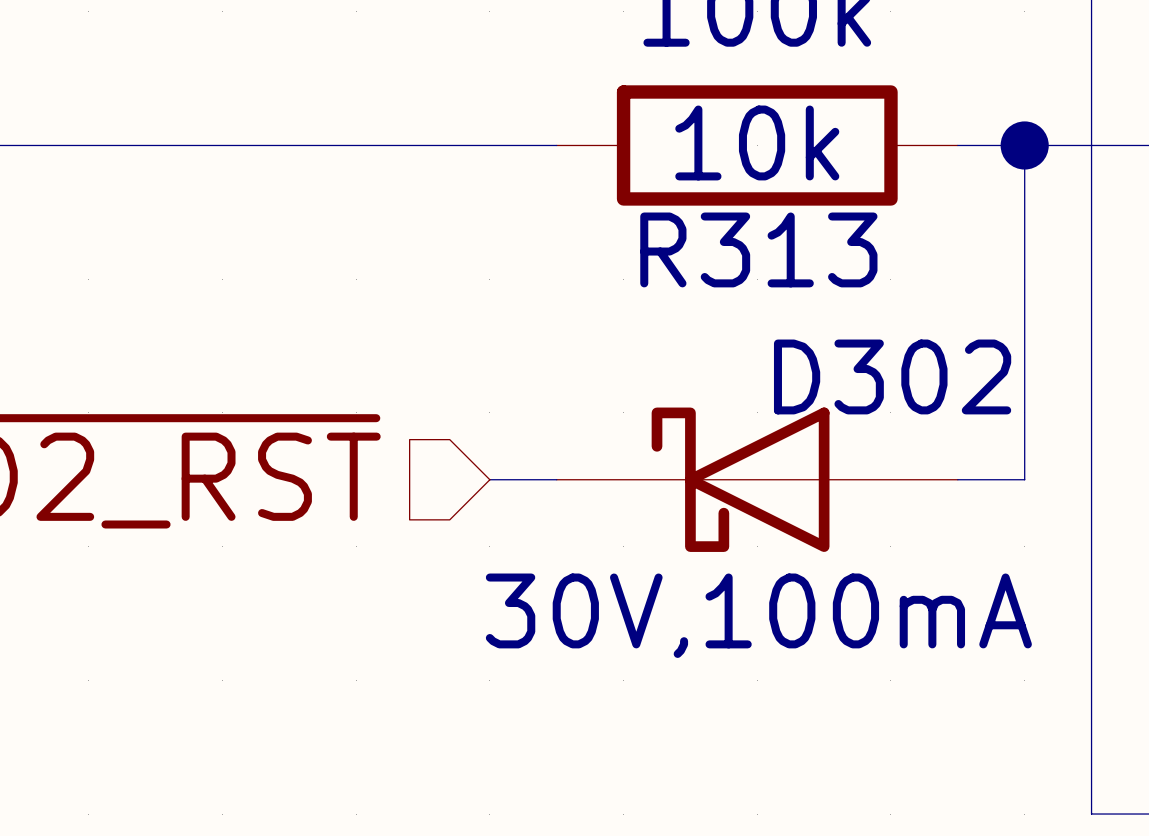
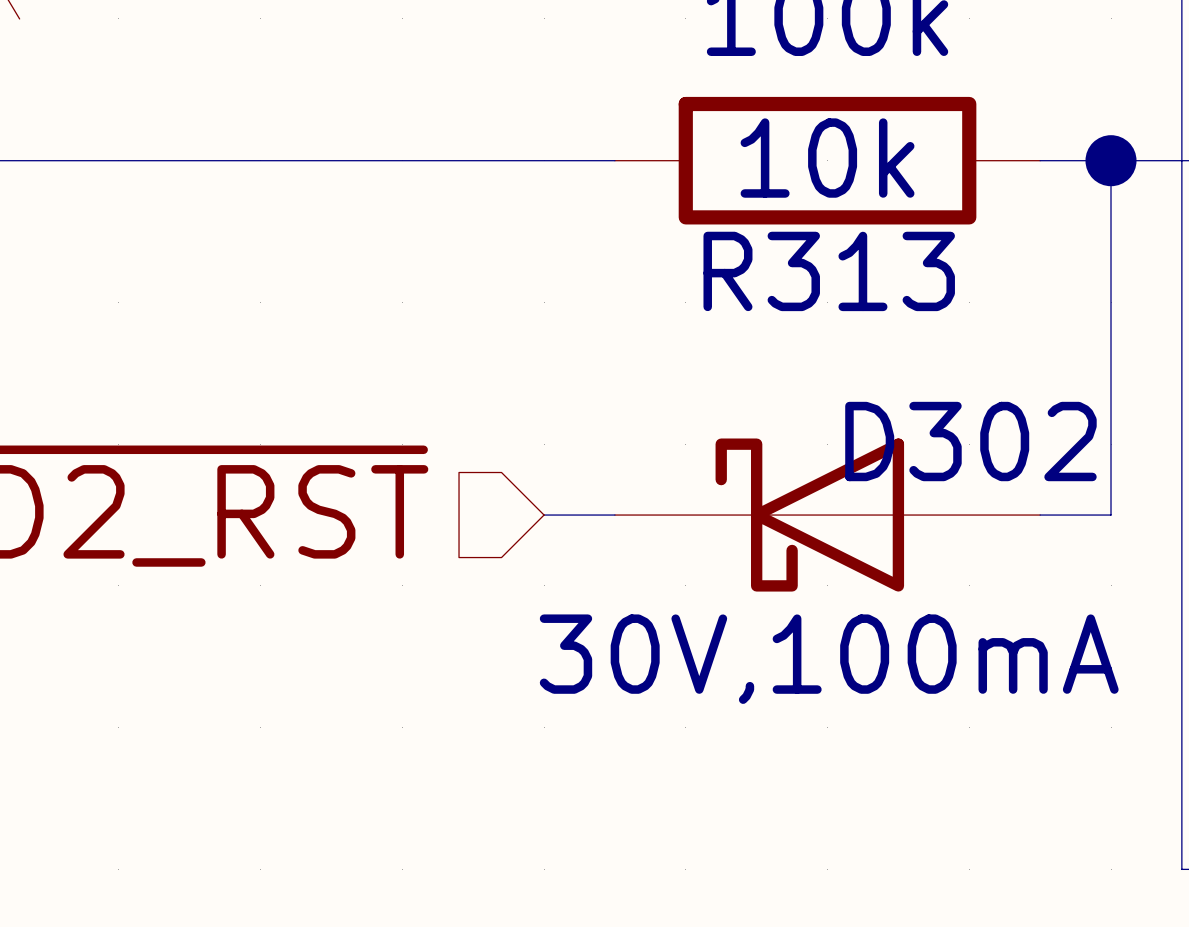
D302 name position: D302 (892, 376) -> D302 (970, 441)

